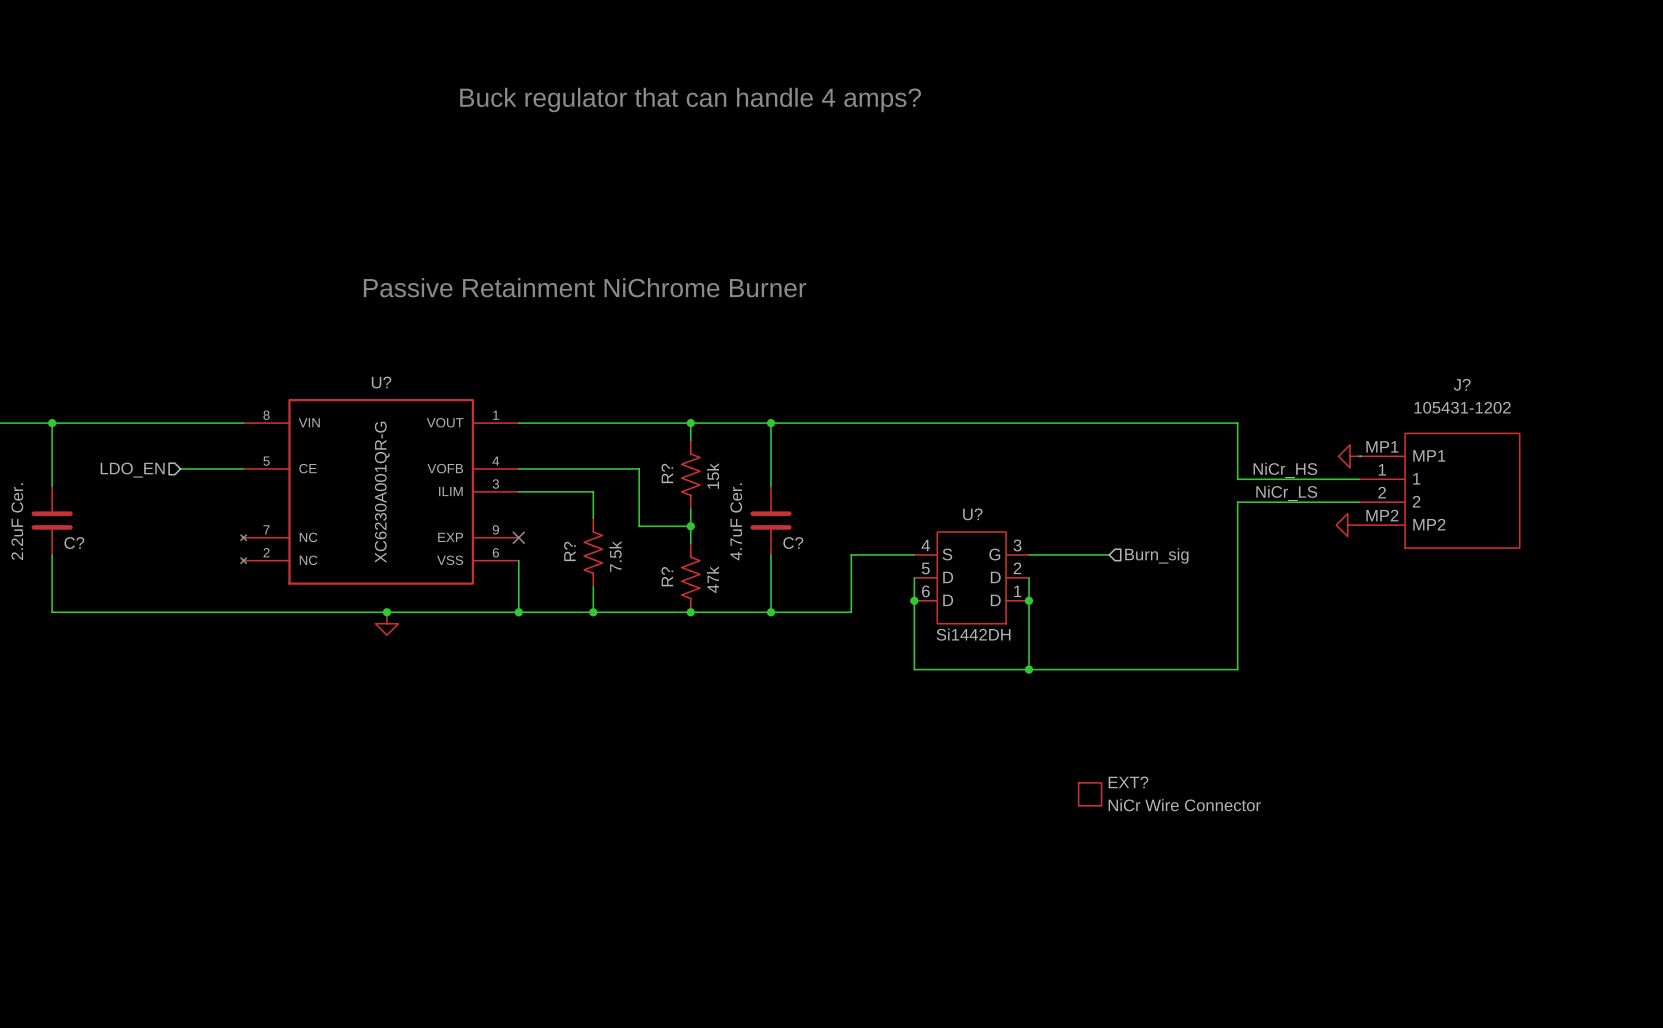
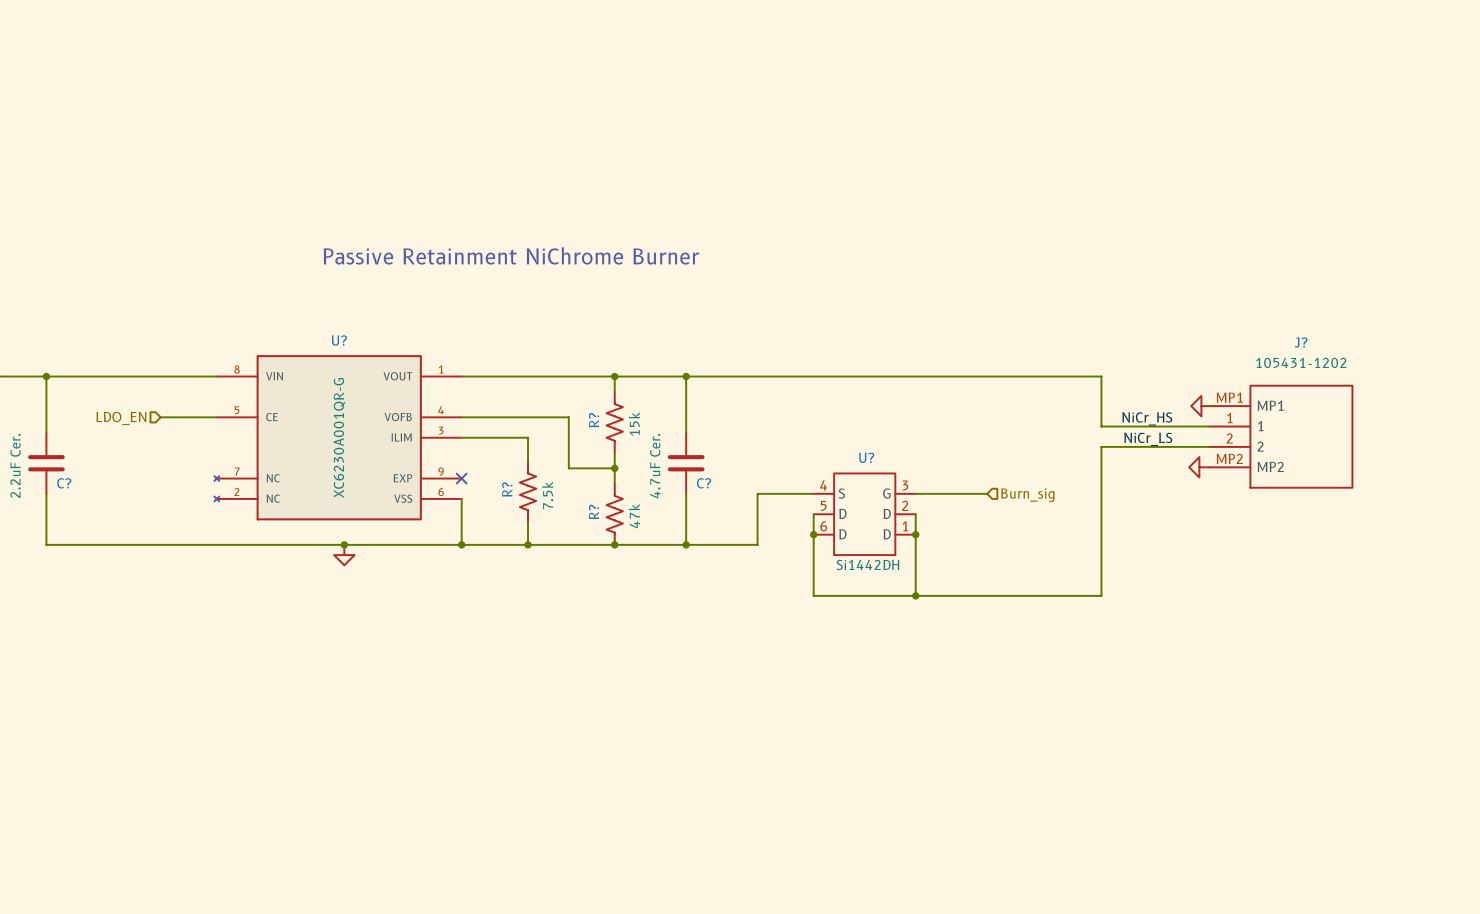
text: Buck regulator that can handle 4 amps? (690, 99) -> none
EXT?: NiCr Wire Connector (1090, 794) -> none

